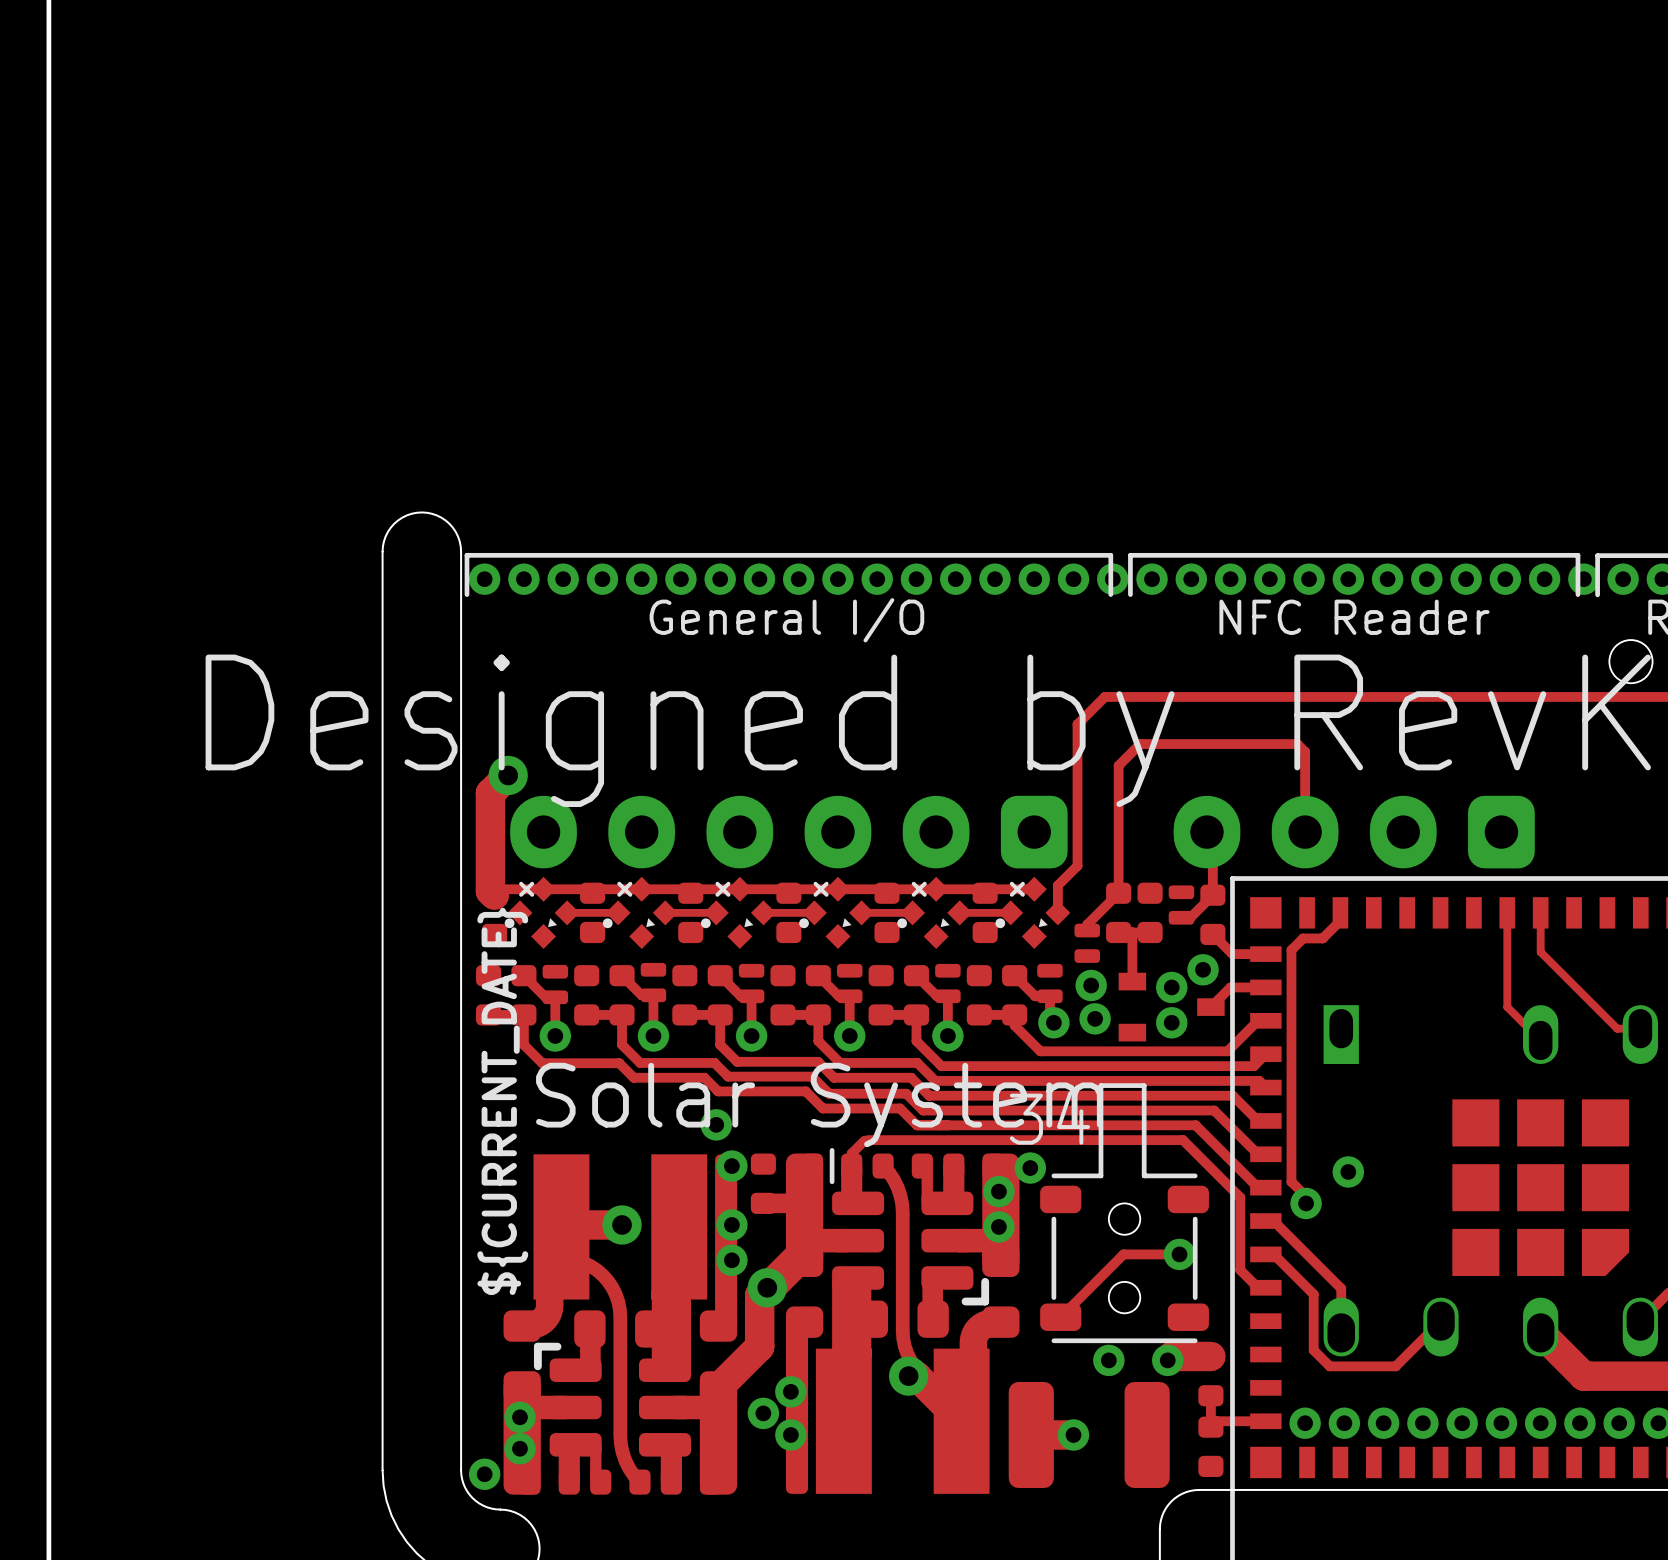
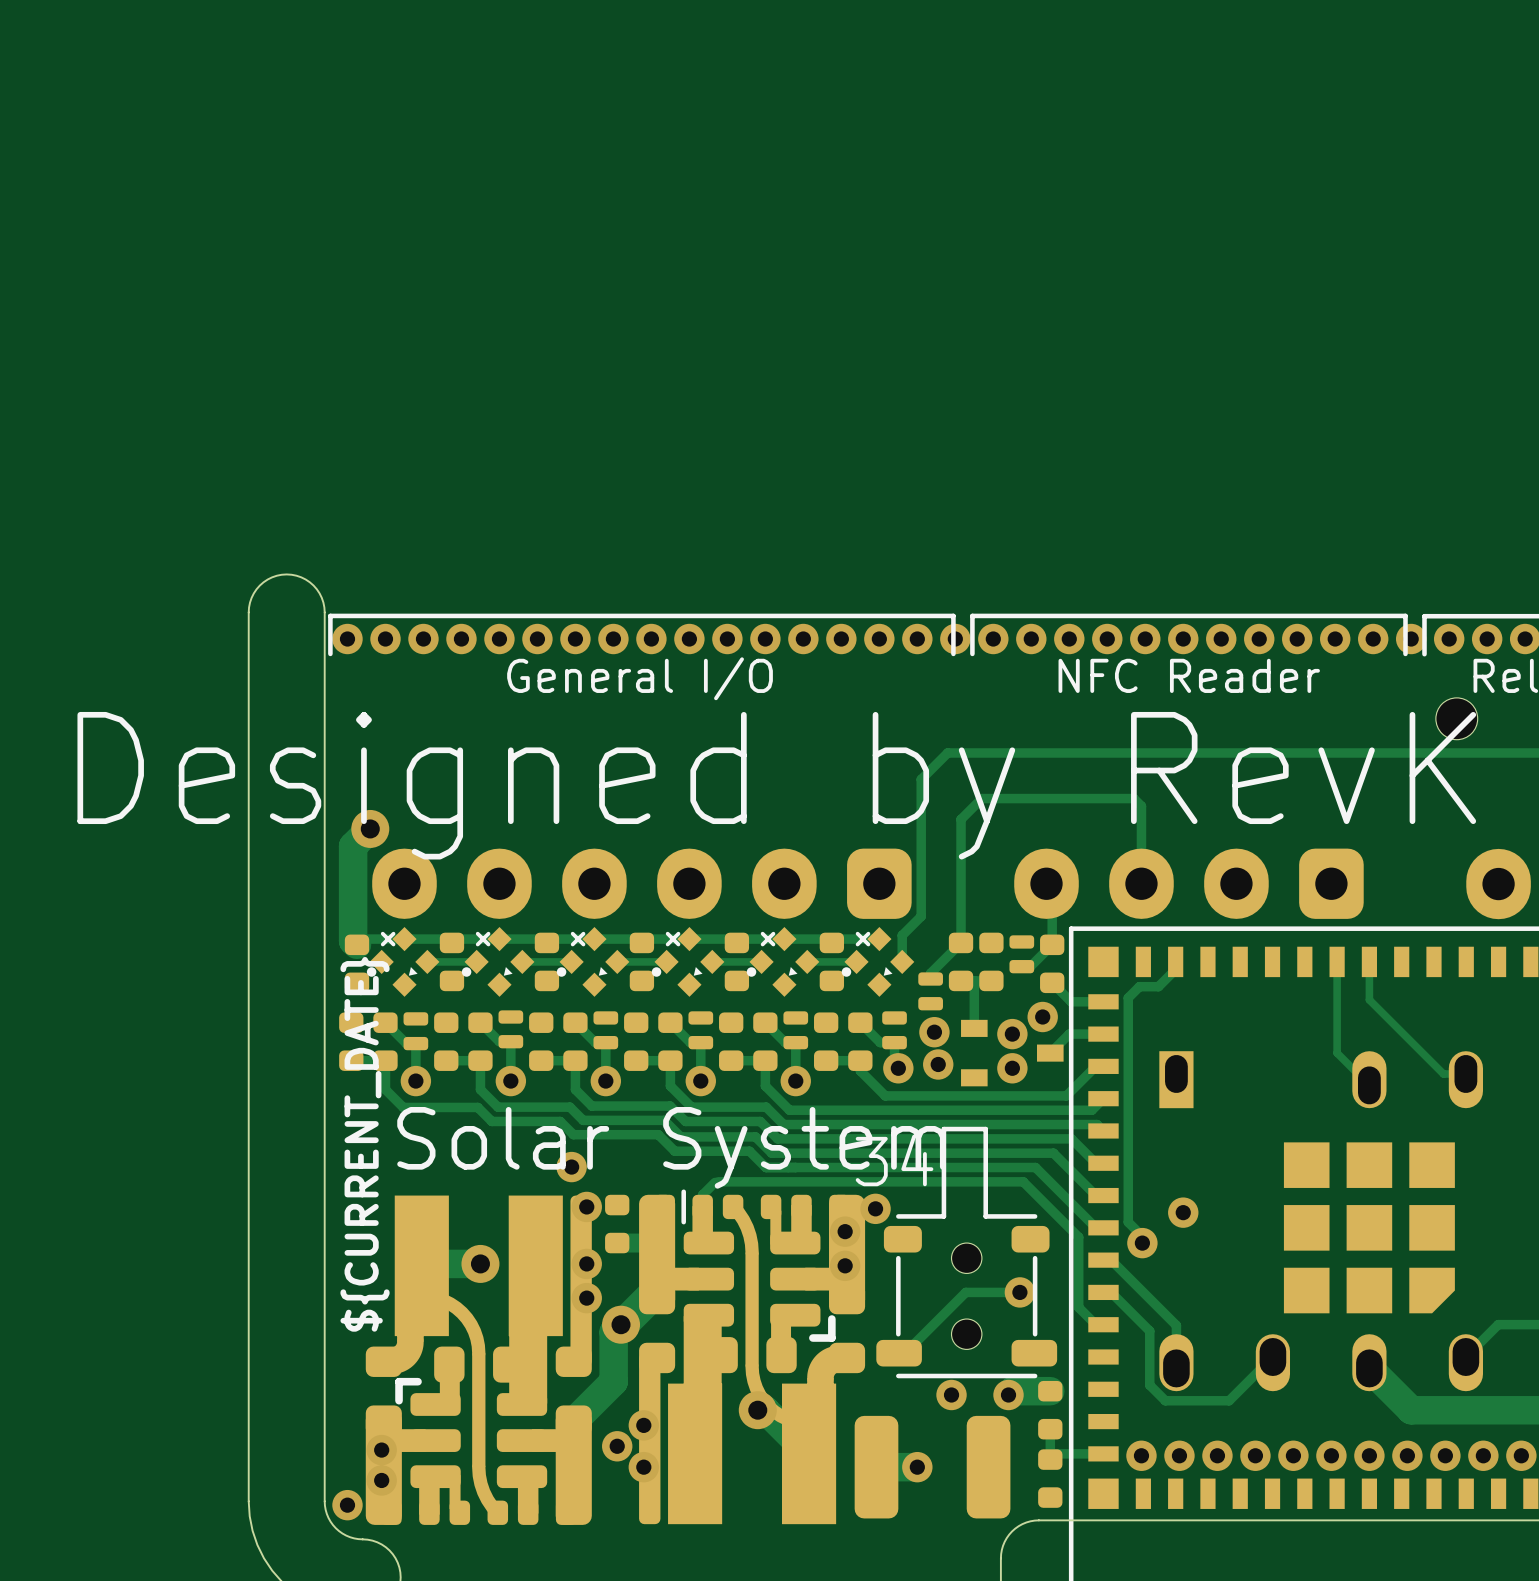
part footprint: [1040, 1083, 1209, 1344] -> [876, 1126, 1058, 1379]

